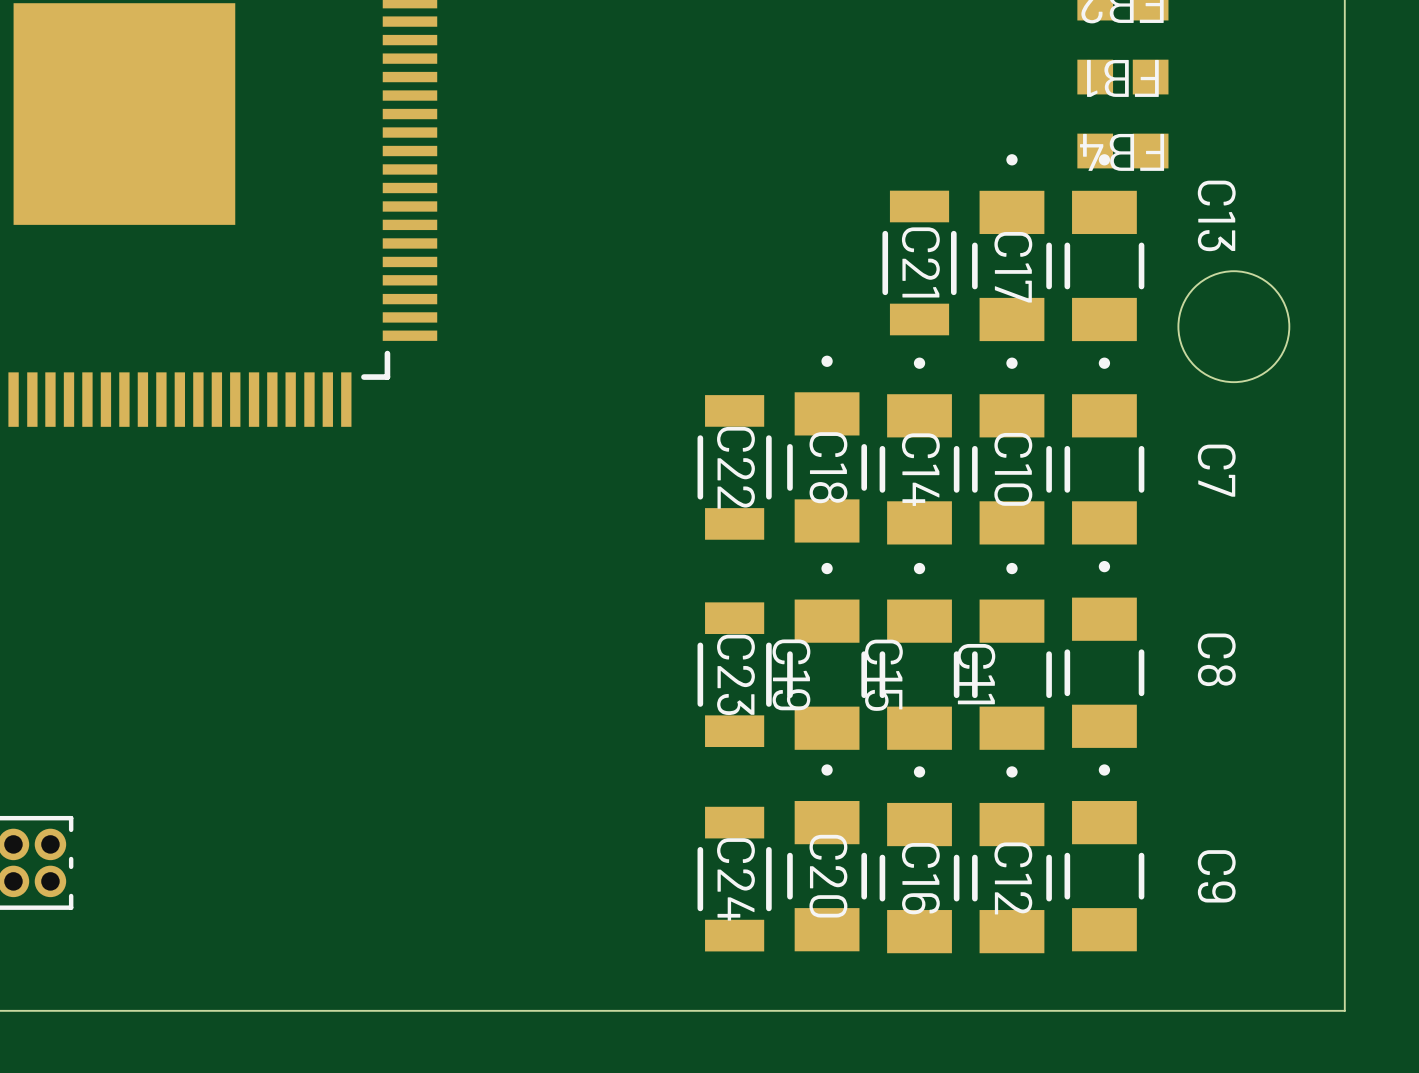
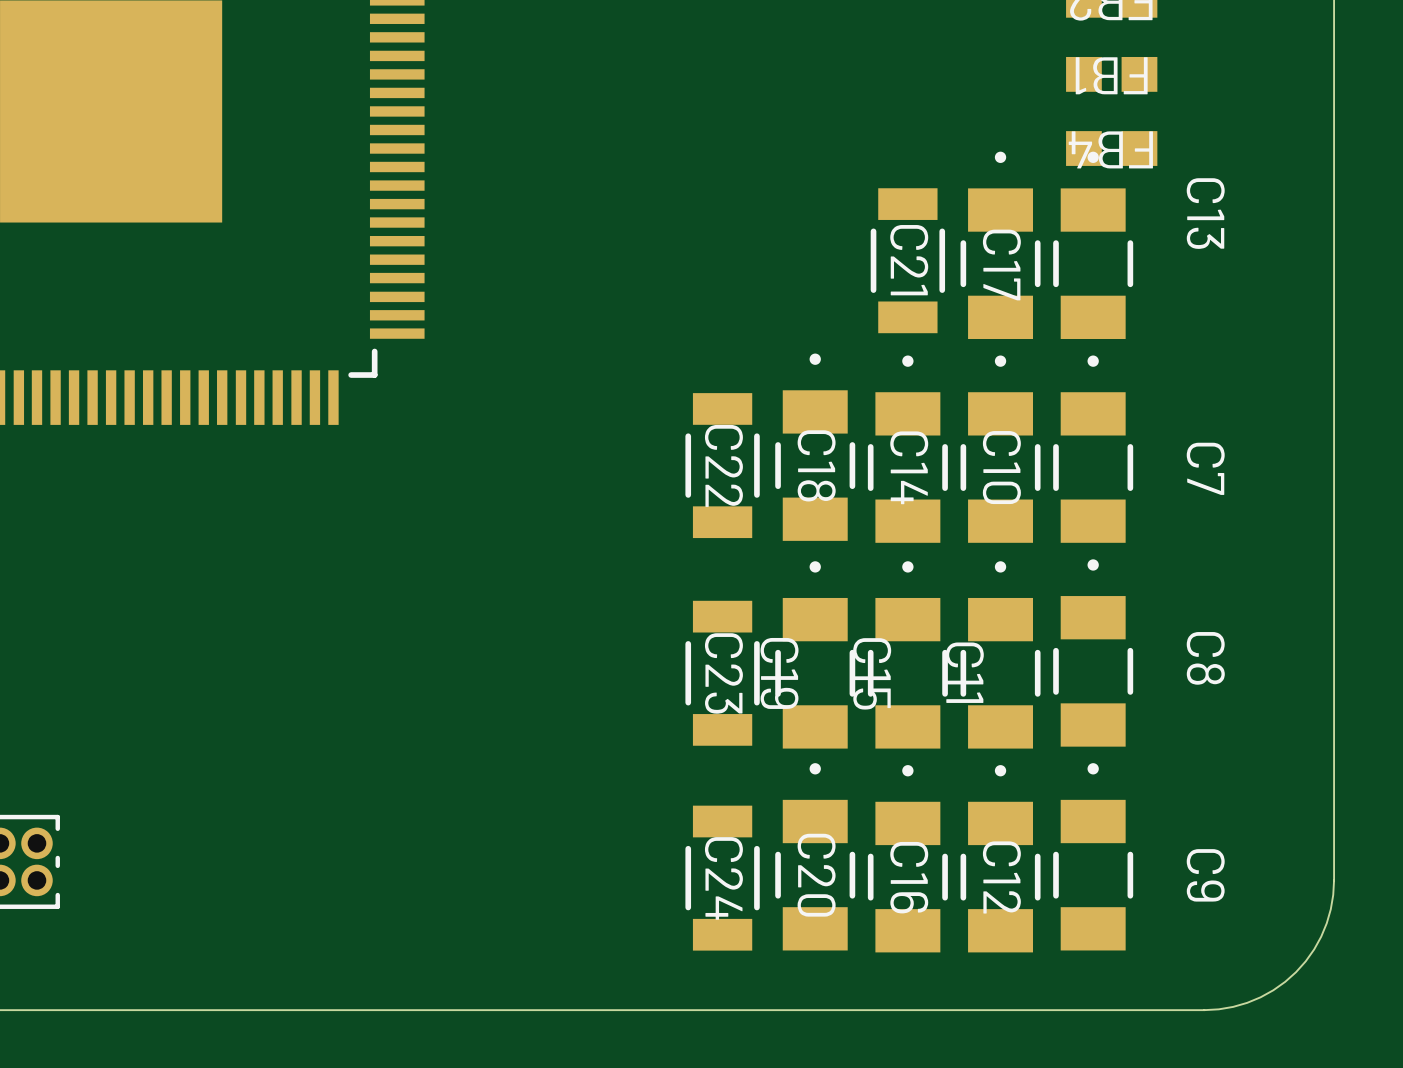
round board edge: [1177, 270, 1291, 384] -> none
board edge: (1344, 881) (1344, 1010) (1215, 1010) -> (1334, 880) (1330, 909) (1321, 936) (1305, 961) (1296, 972) (1273, 990) (1247, 1002) (1218, 1009) (1204, 1010)

